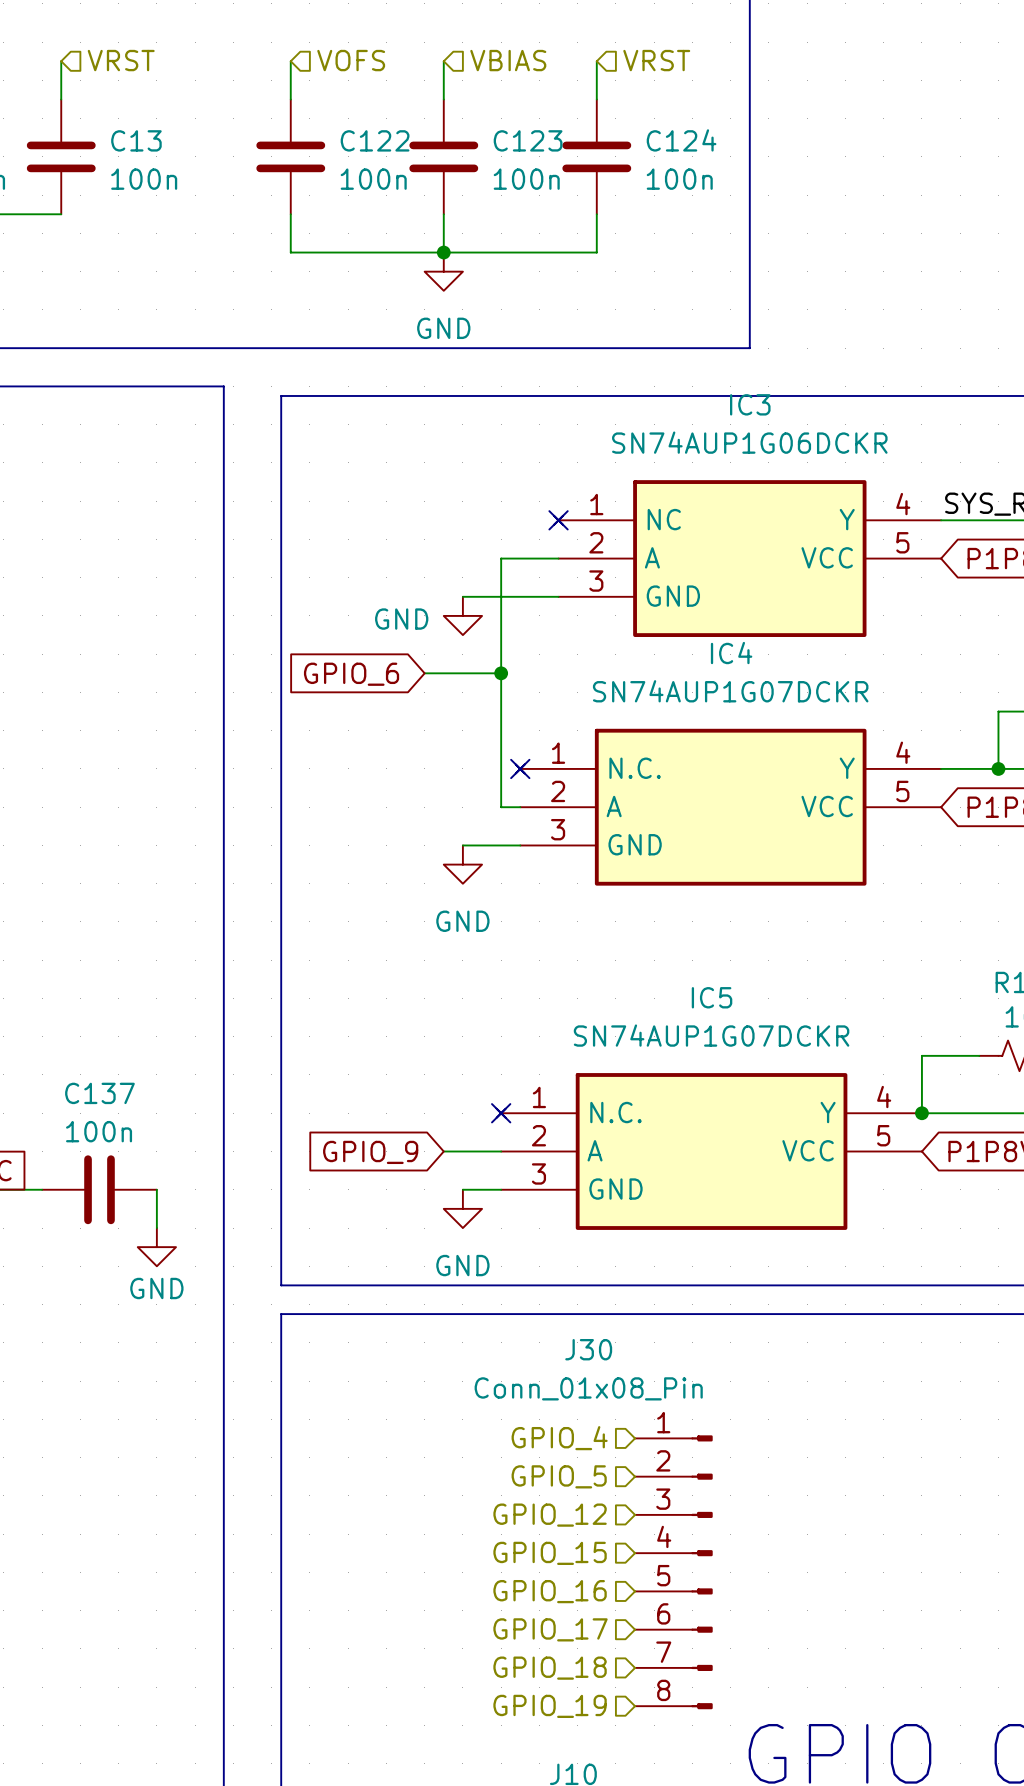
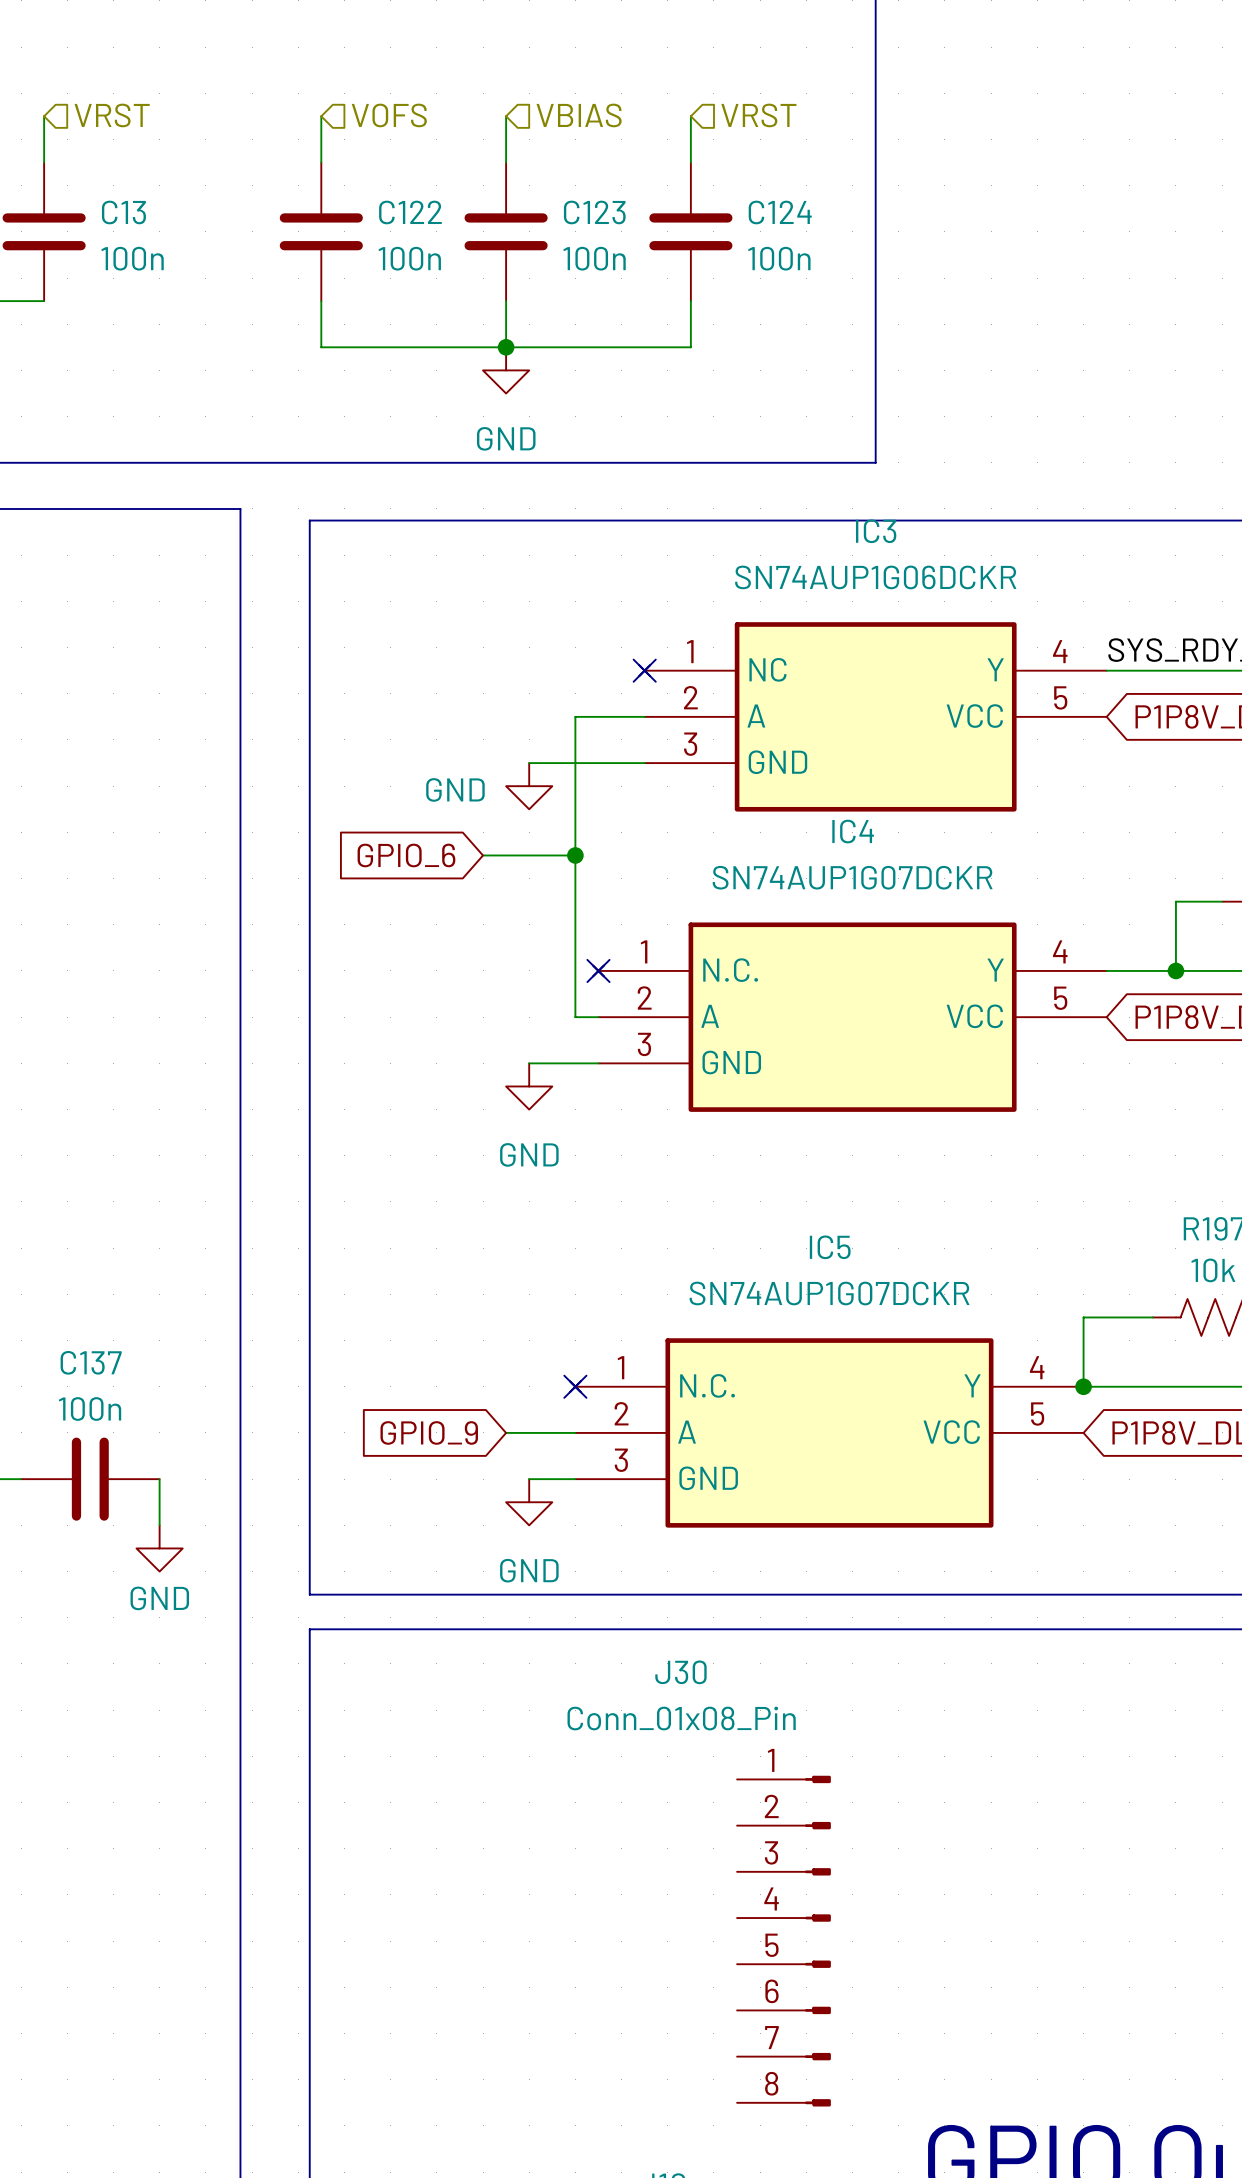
hierarchical label: GPIO_4 (559, 1438) -> none
hierarchical label: GPIO_5 (559, 1476) -> none
hierarchical label: GPIO_12 (550, 1515) -> none
hierarchical label: GPIO_15 (550, 1553) -> none
hierarchical label: GPIO_16 (550, 1591) -> none
hierarchical label: GPIO_17 (550, 1629) -> none
hierarchical label: GPIO_18 (550, 1668) -> none
hierarchical label: GPIO_19 (550, 1706) -> none

